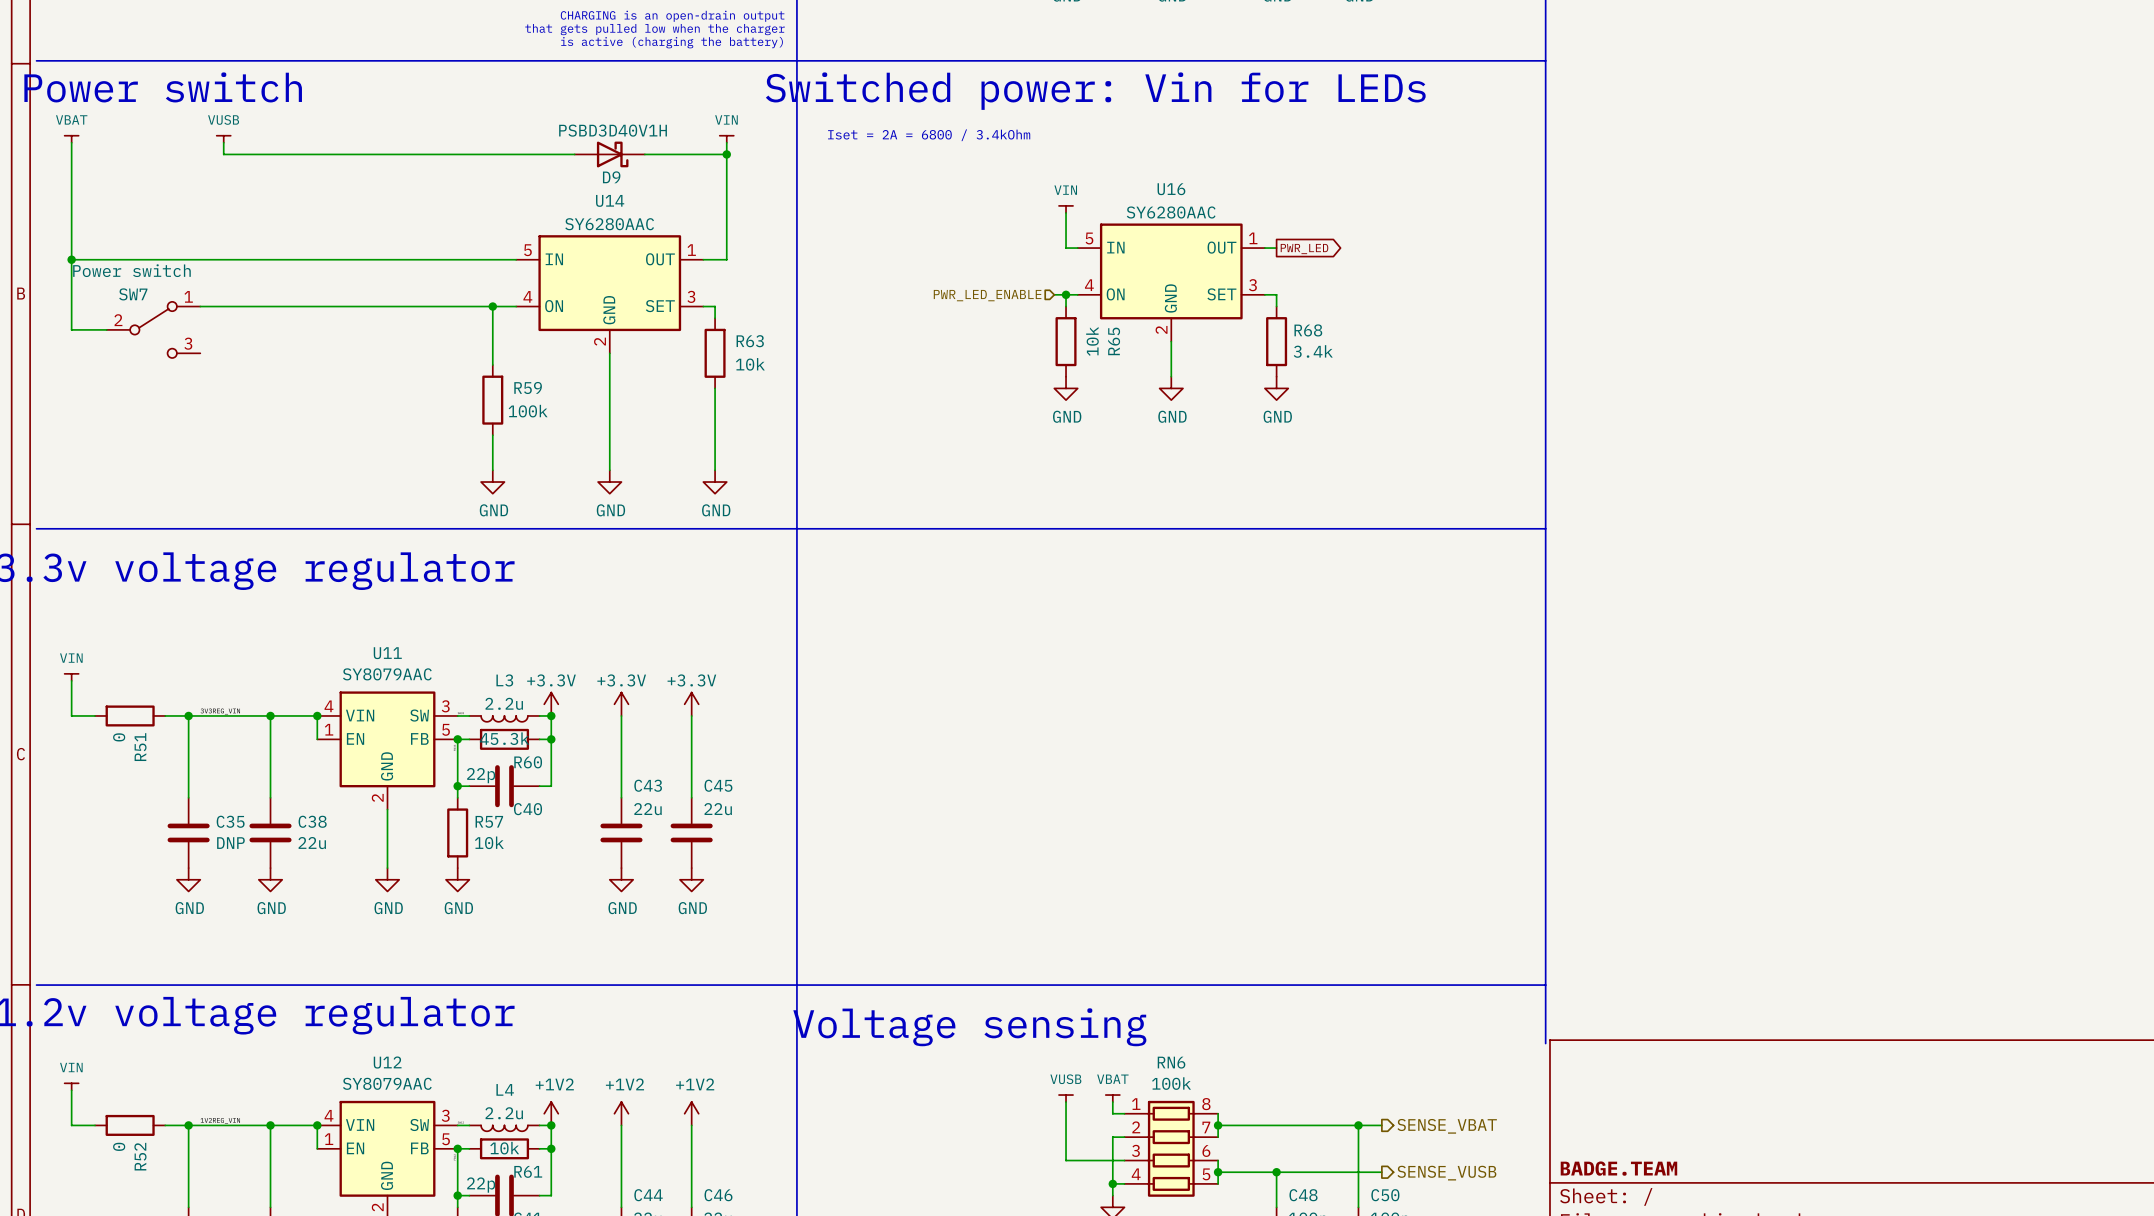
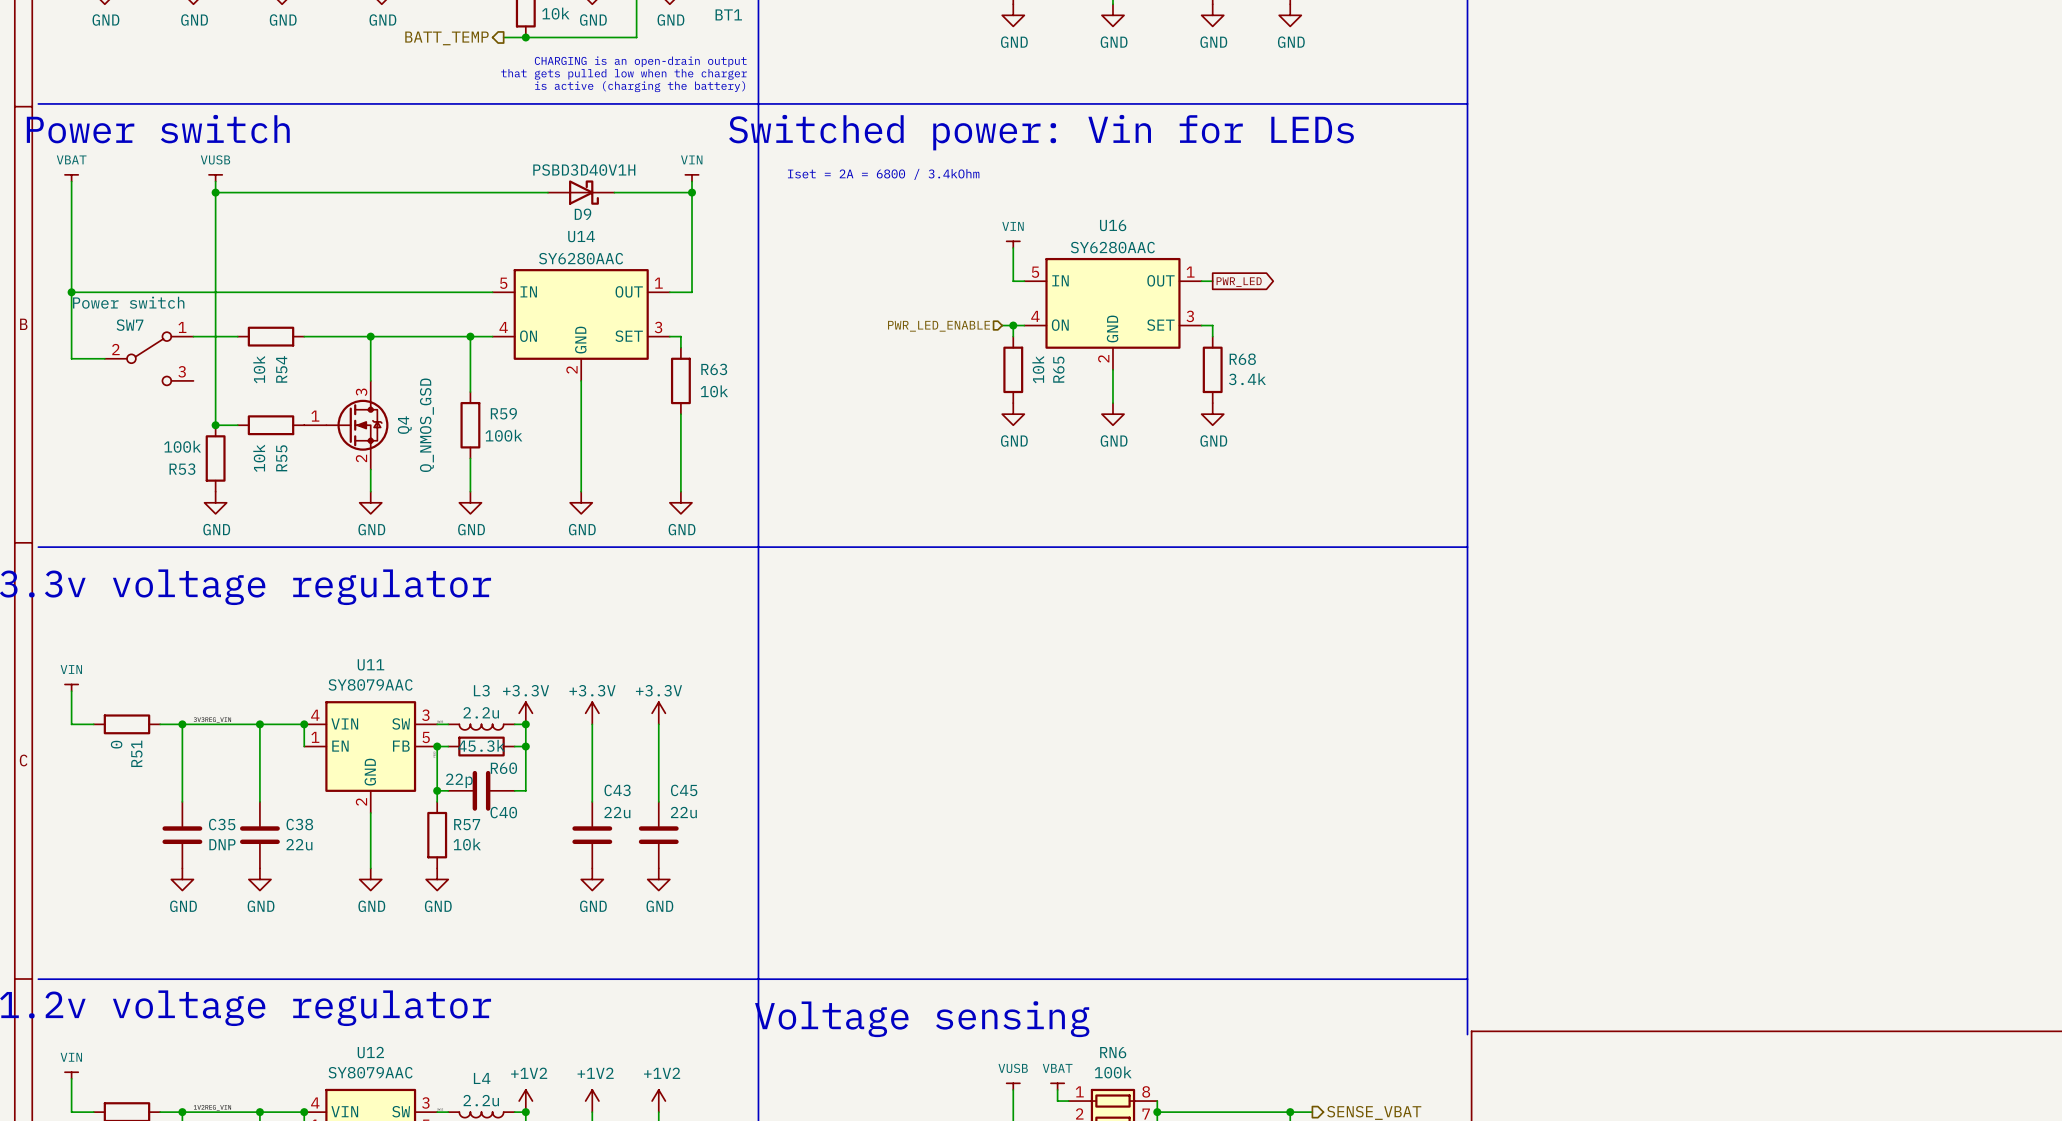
wire: none -> (215, 192) (215, 425) (237, 425)
junction: none -> (215, 192)
wire: (247, 306) (317, 306) -> none
R54: none -> 10k (271, 336)
wire: none -> (370, 336) (370, 380)
junction: none -> (370, 336)
junction: none -> (215, 425)
R55: none -> 10k (271, 425)
Q4: none -> Q_NMOS_GSD (346, 425)
R53: none -> 100k (215, 458)
wire: none -> (370, 469) (370, 491)
power symbol: none -> GND (215, 502)
power symbol: none -> GND (370, 502)

